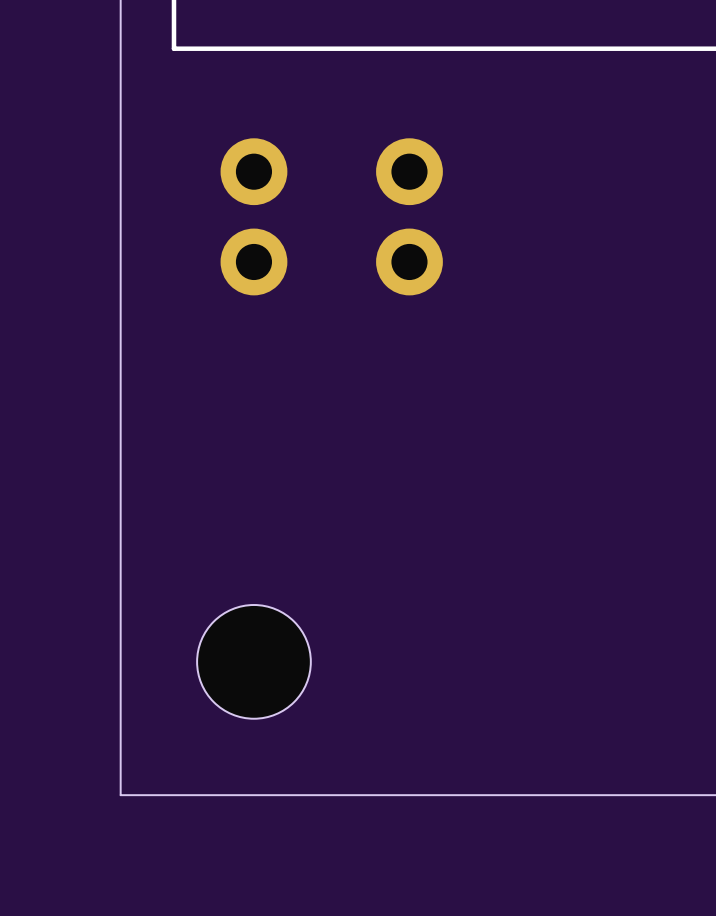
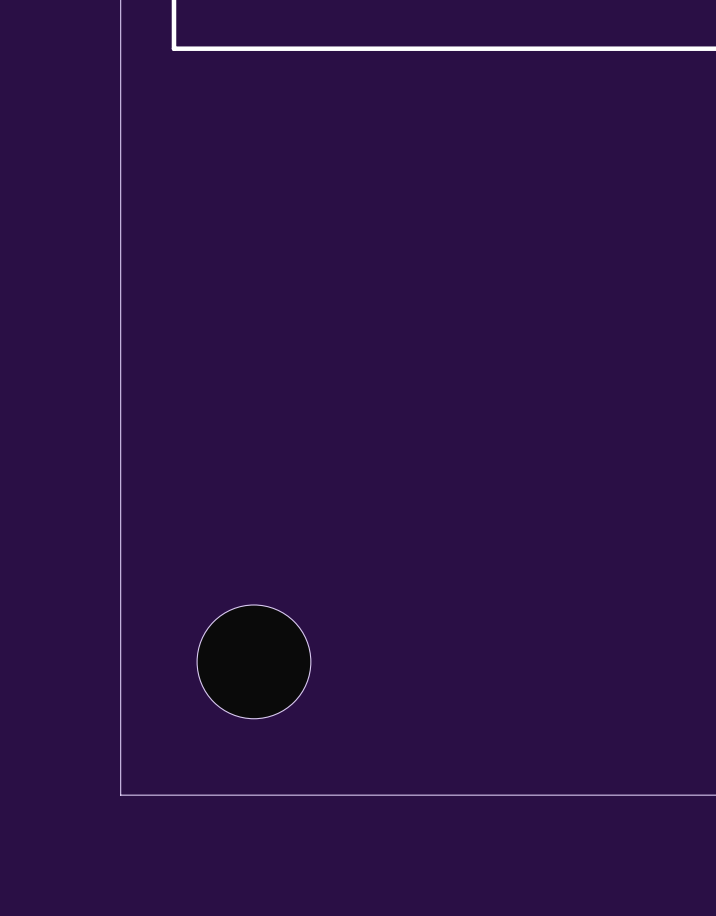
part: (253, 216) -> none
part: (409, 216) -> none

